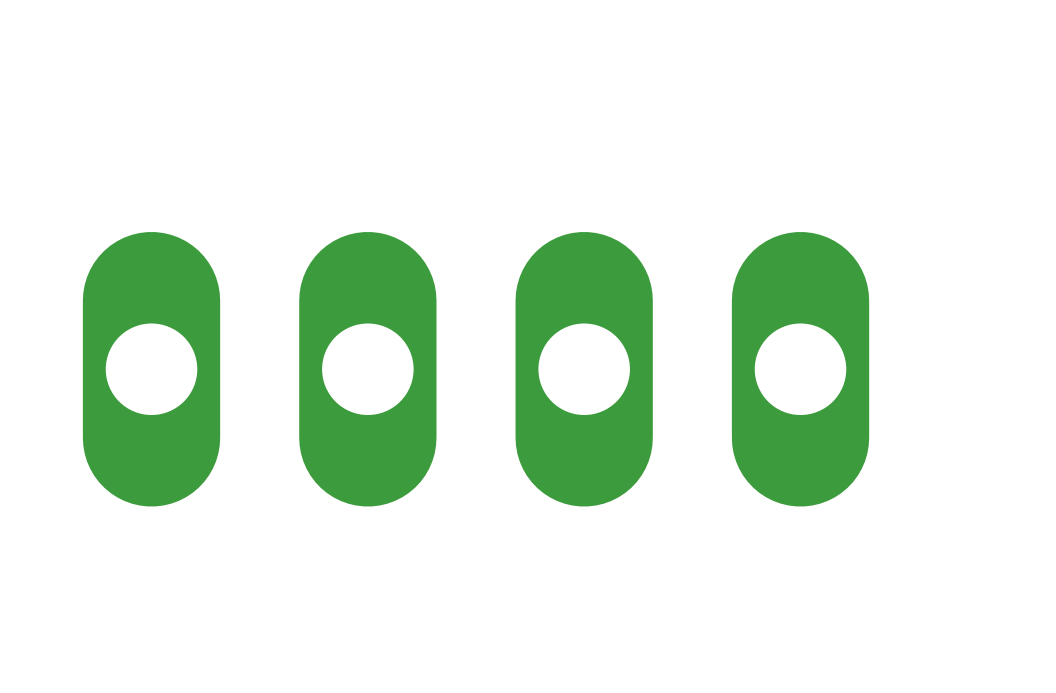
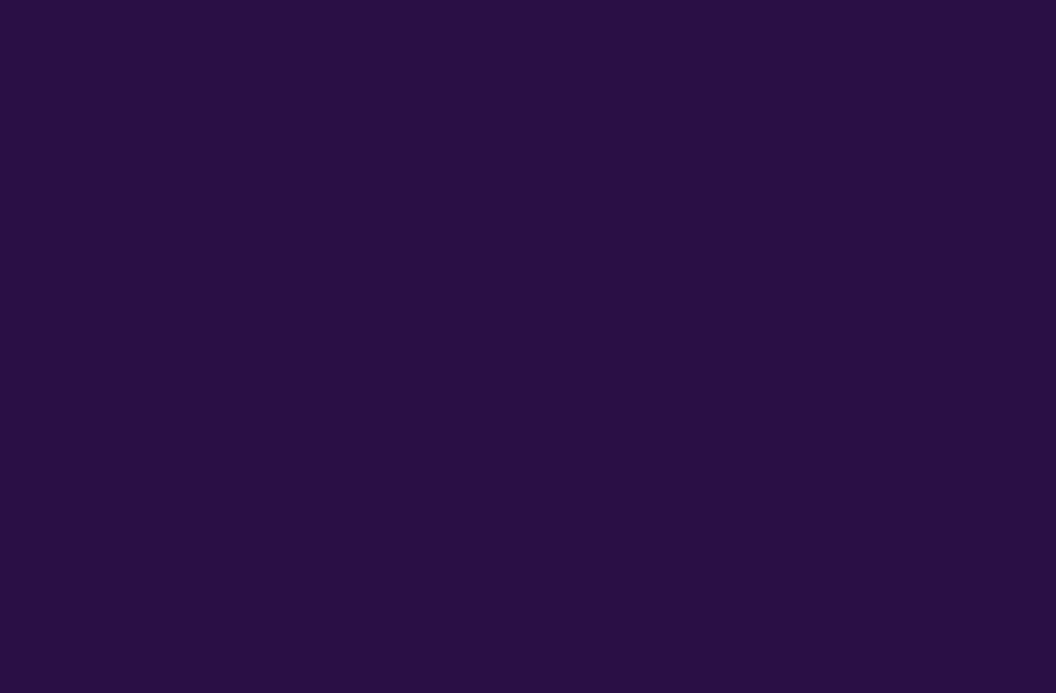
part: (476, 369) -> none

